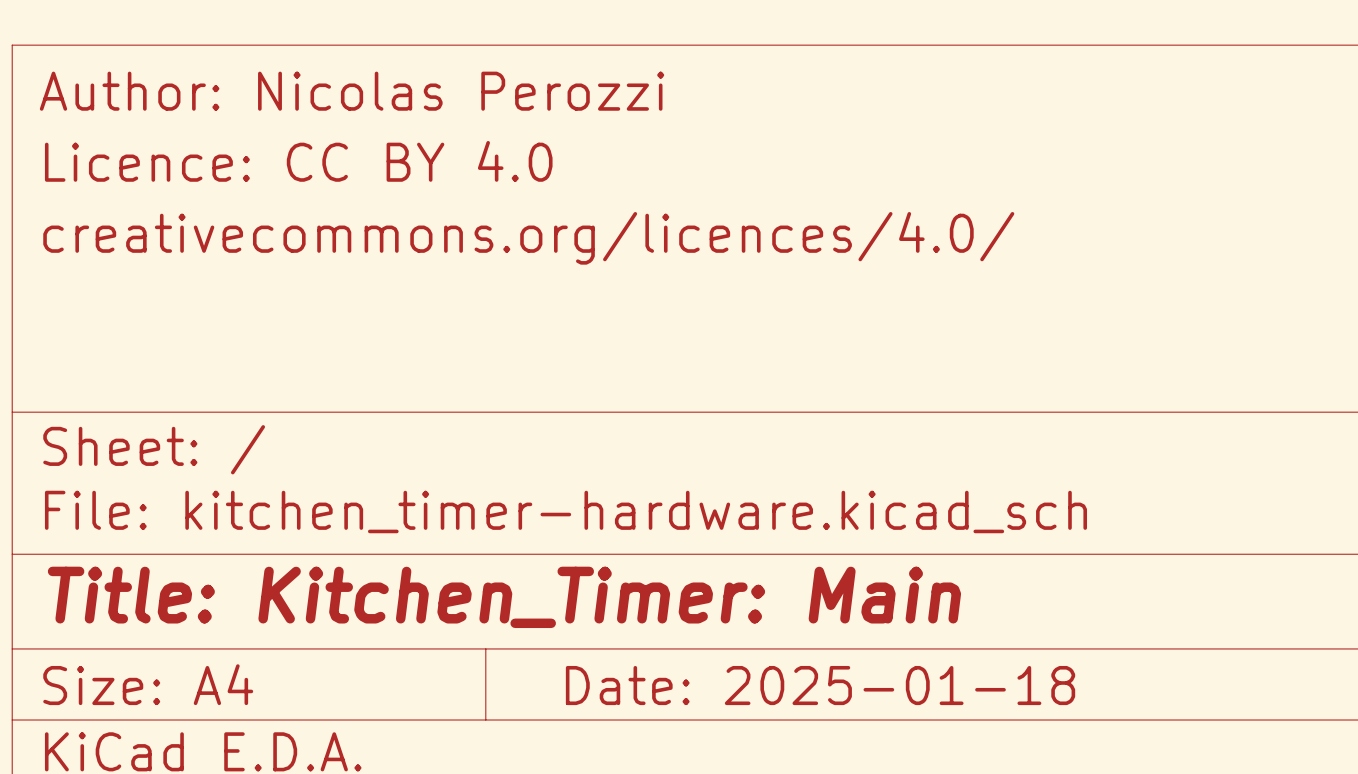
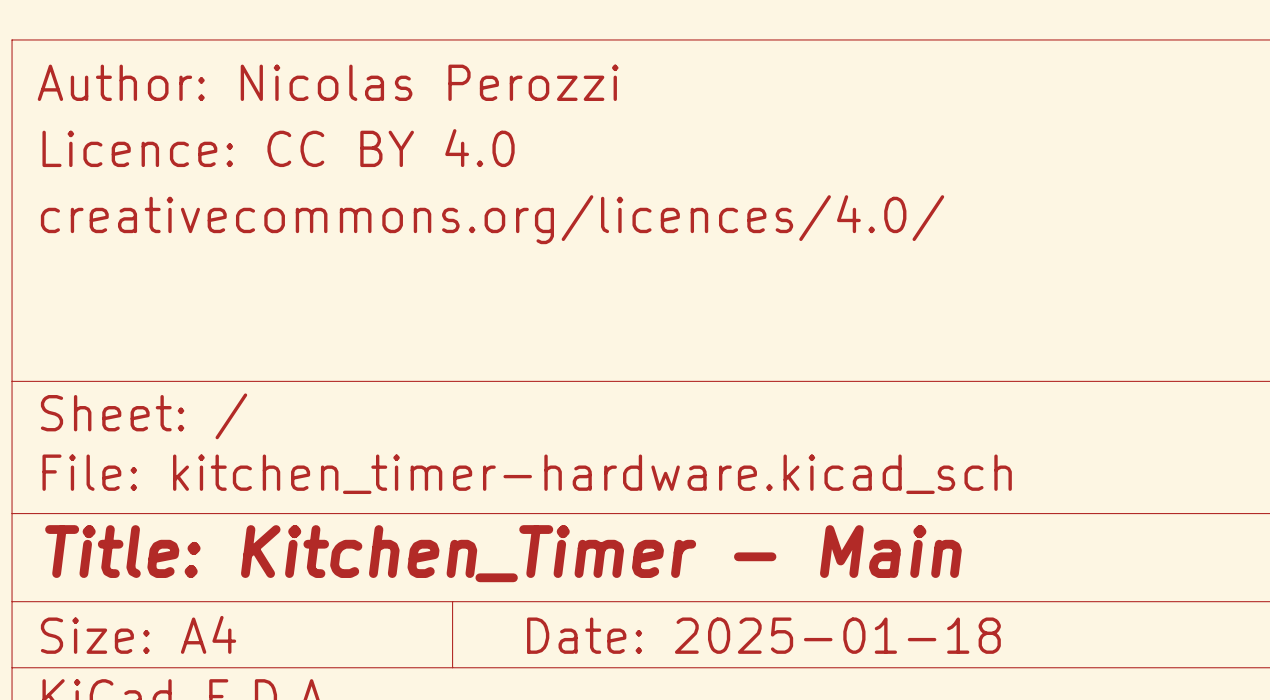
title block: Title: Kitchen_Timer: Main (504, 597) -> Title: Kitchen_Timer - Main (503, 553)

